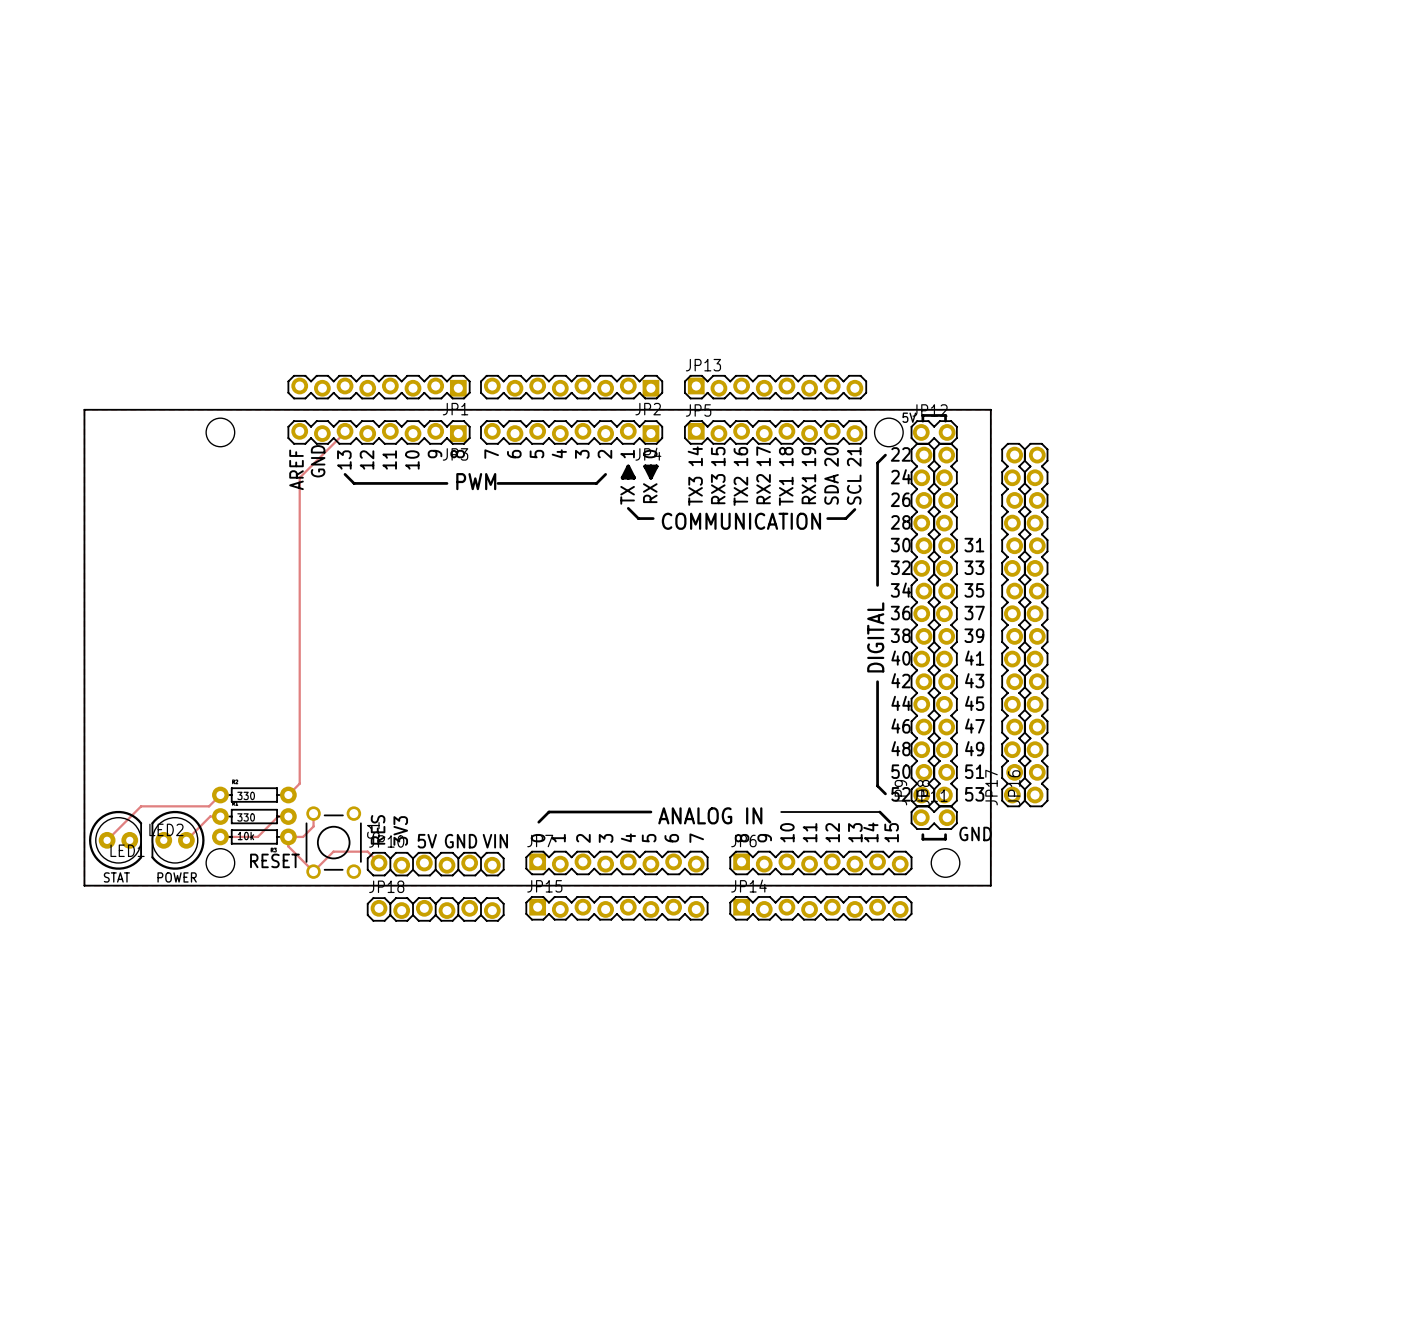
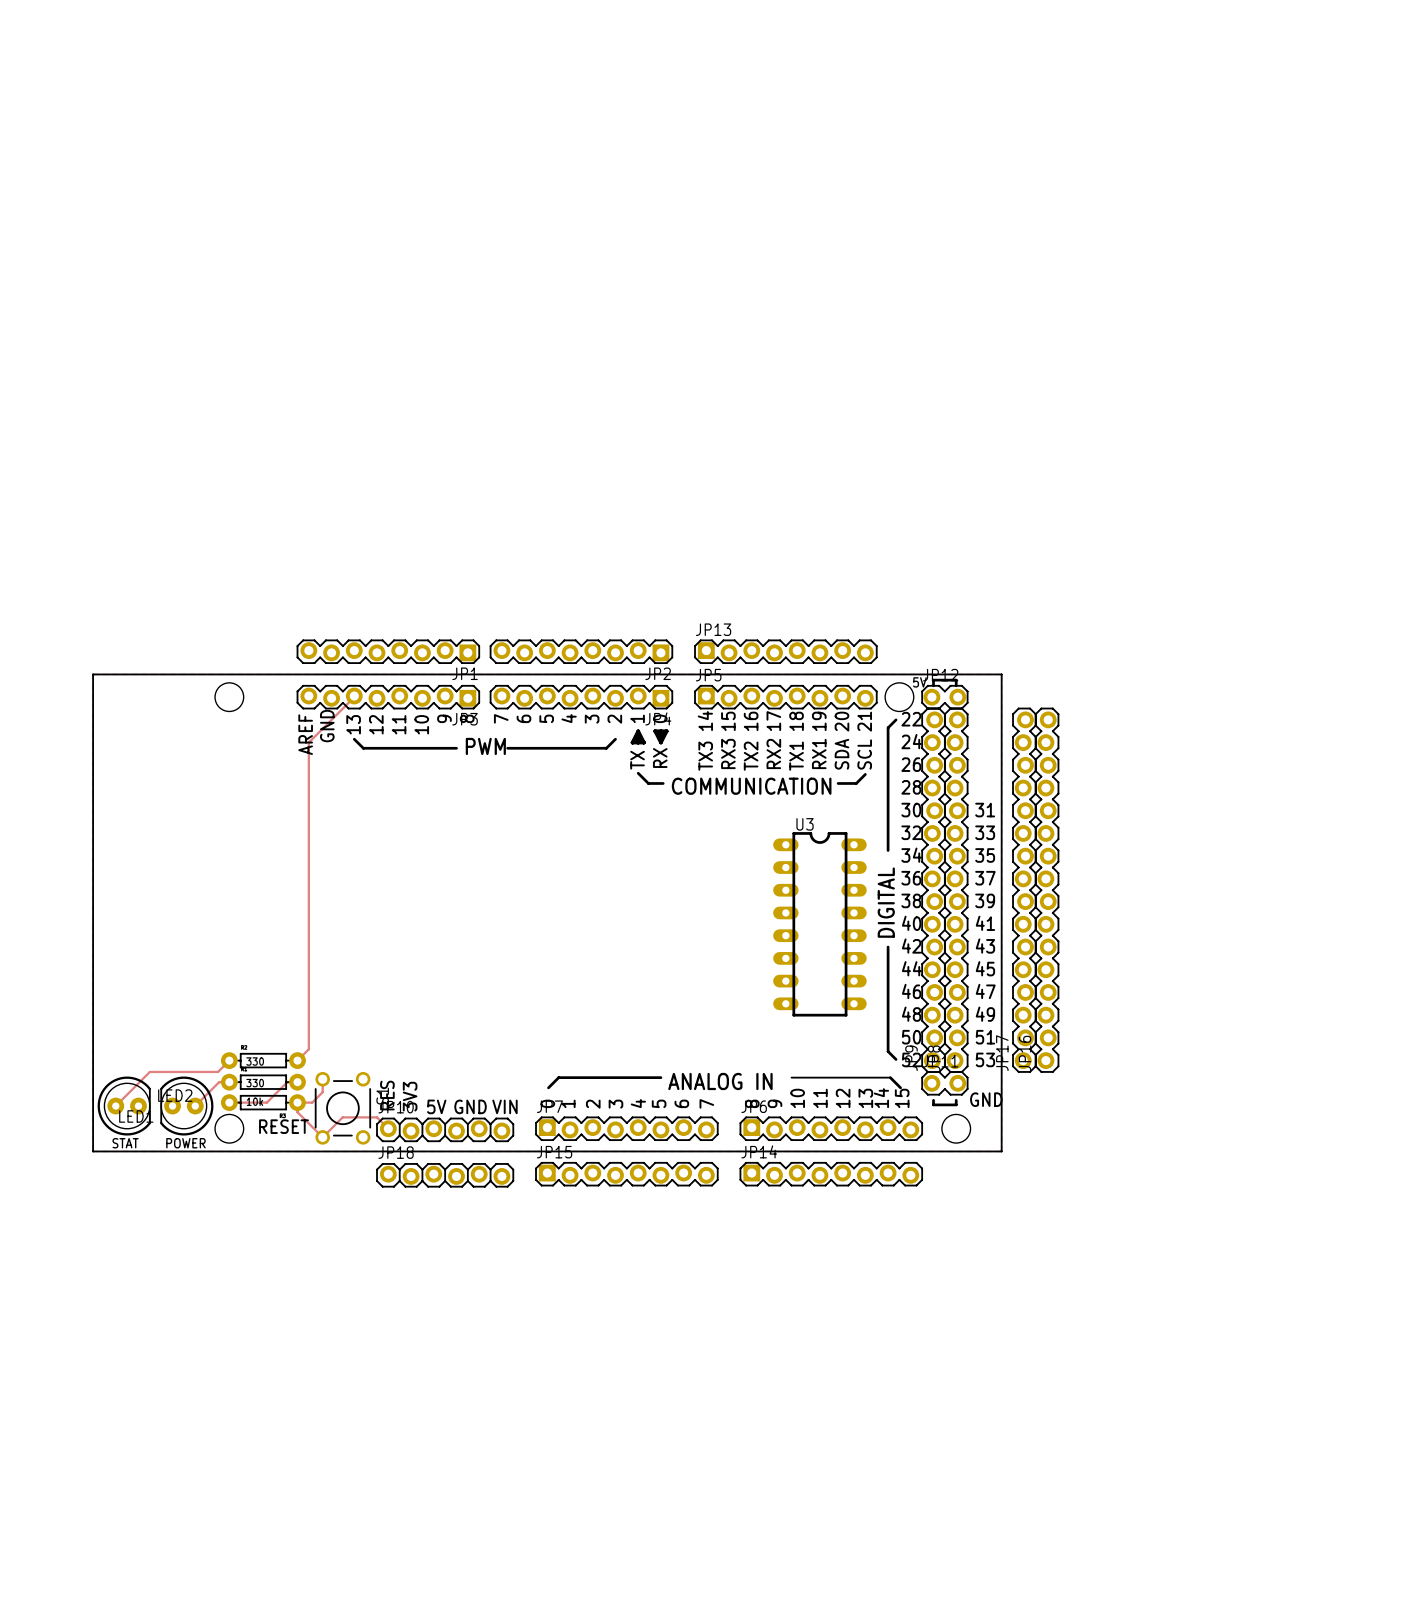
U3: none -> (819, 924)

